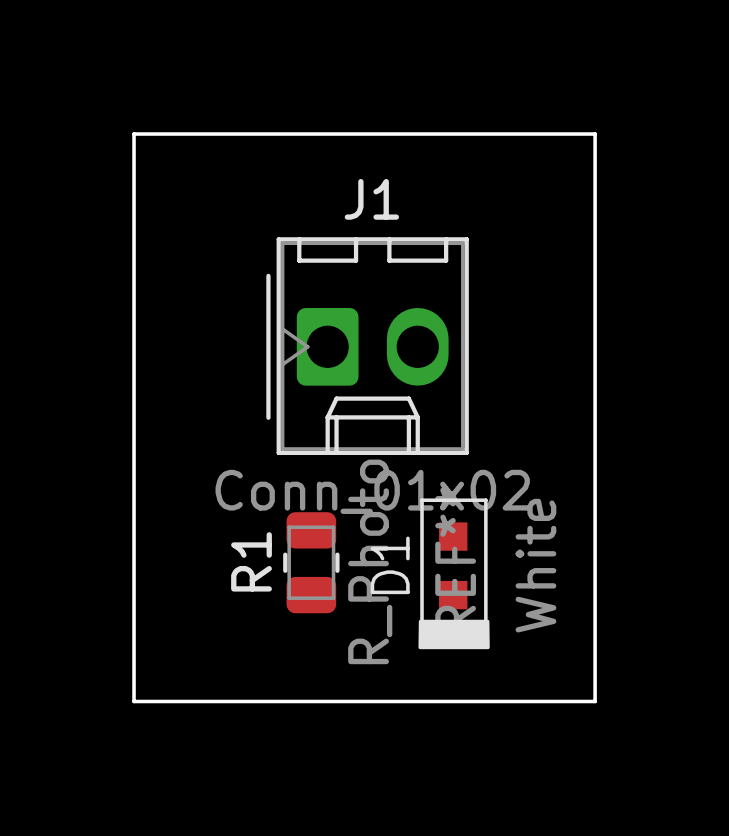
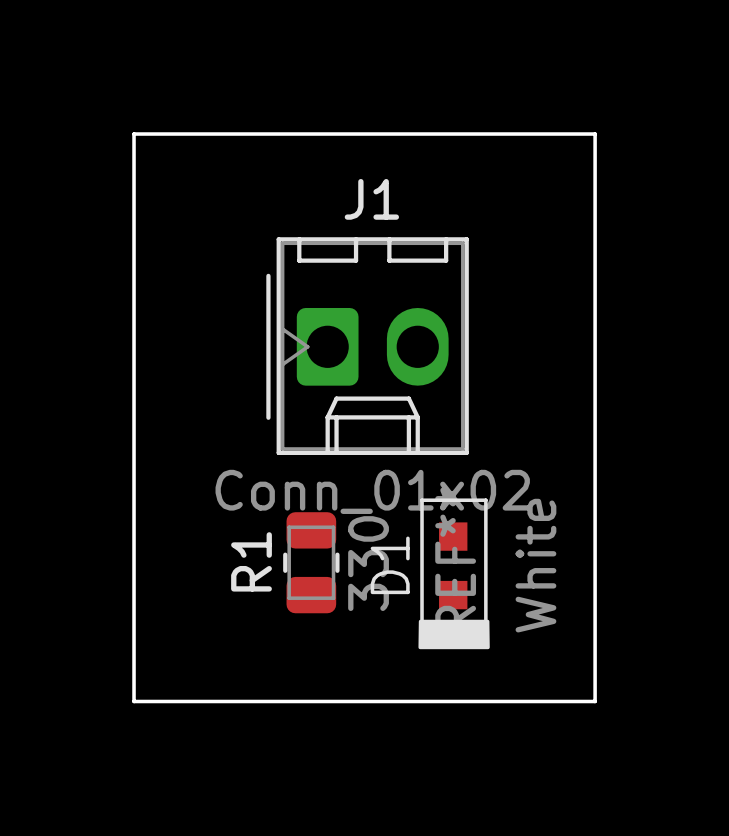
R1 value: R_Photo (370, 561) -> 330 (368, 563)

